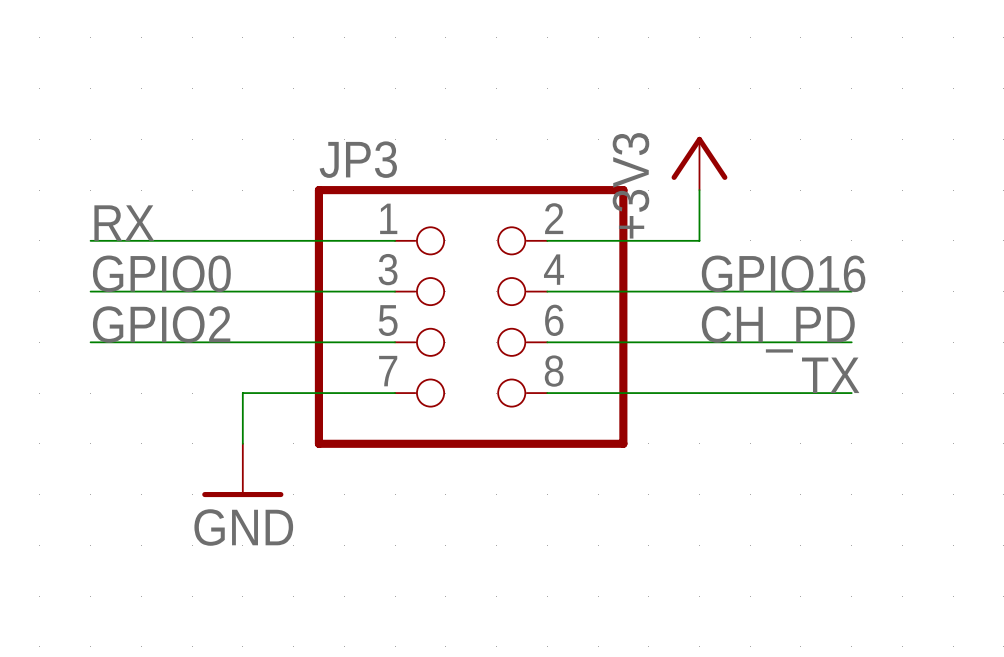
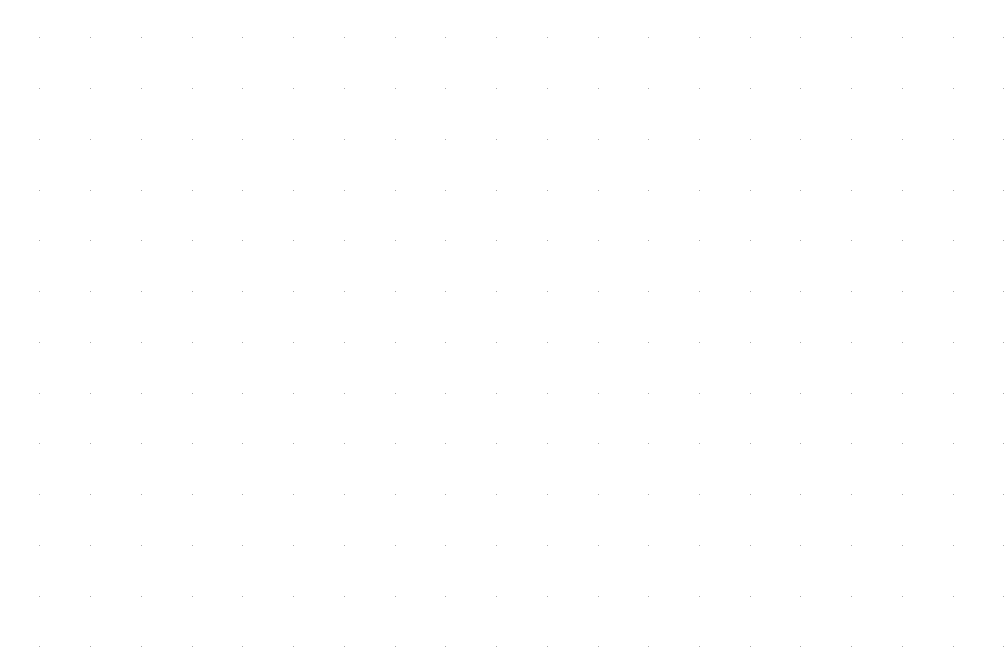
power symbol: +3V3 (699, 163) -> none
wire: (699, 190) (699, 240) (547, 240) -> none
label: RX (124, 223) -> none
wire: (90, 240) (395, 240) -> none
label: GPIO0 (161, 273) -> none
label: GPIO16 (783, 273) -> none
wire: (90, 291) (395, 291) -> none
wire: (547, 291) (851, 291) -> none
JP3: (471, 316) -> none
label: GPIO2 (161, 324) -> none
label: CH_PD (778, 329) -> none
wire: (90, 342) (395, 342) -> none
wire: (547, 342) (851, 342) -> none
label: TX (830, 375) -> none
wire: (395, 393) (242, 393) (242, 443) -> none
wire: (547, 393) (851, 393) -> none
power symbol: GND (242, 470) -> none

